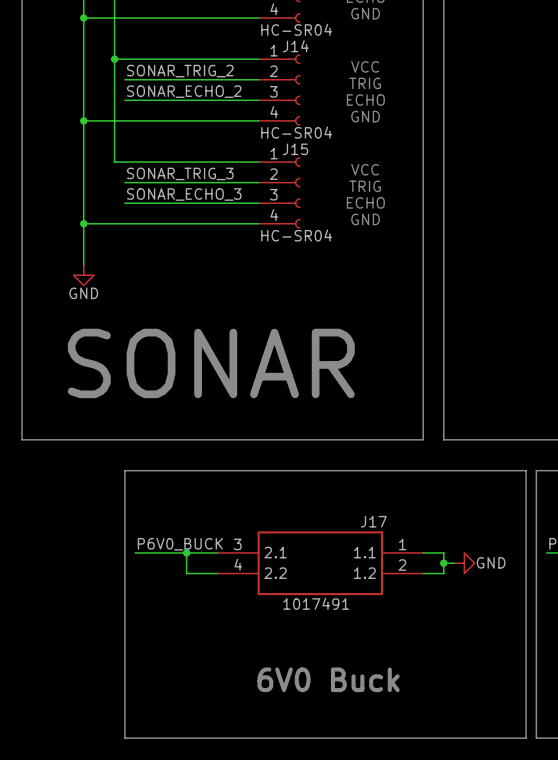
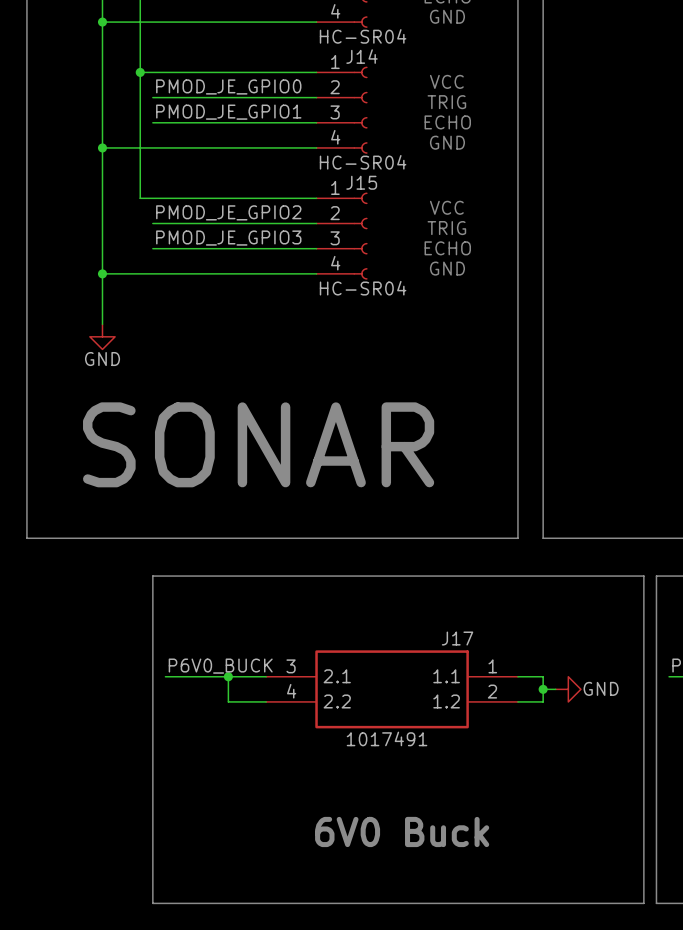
label: SONAR_TRIG_2 (180, 71) -> PMOD_JE_GPIO0 (228, 86)
label: SONAR_ECHO_2 (184, 91) -> PMOD_JE_GPIO1 (228, 112)
label: SONAR_TRIG_3 (180, 173) -> PMOD_JE_GPIO2 (228, 212)
label: SONAR_ECHO_3 (184, 194) -> PMOD_JE_GPIO3 (228, 238)

